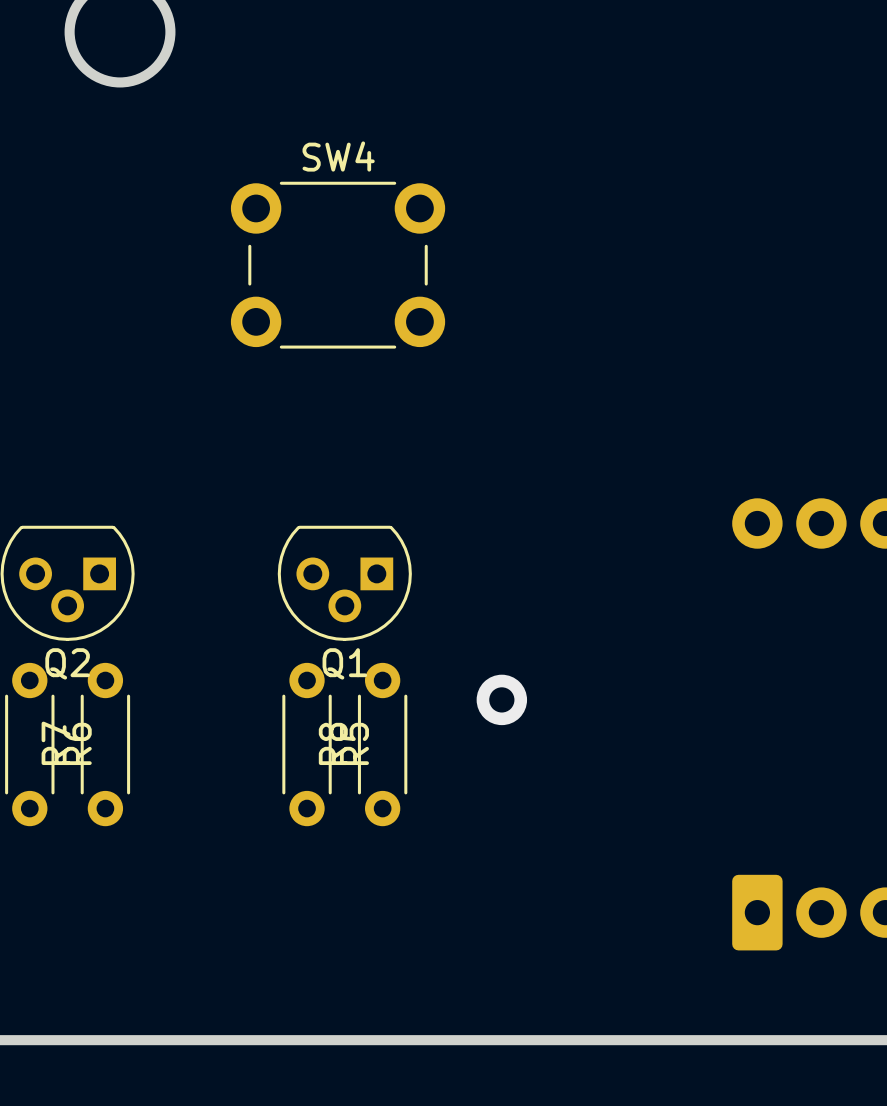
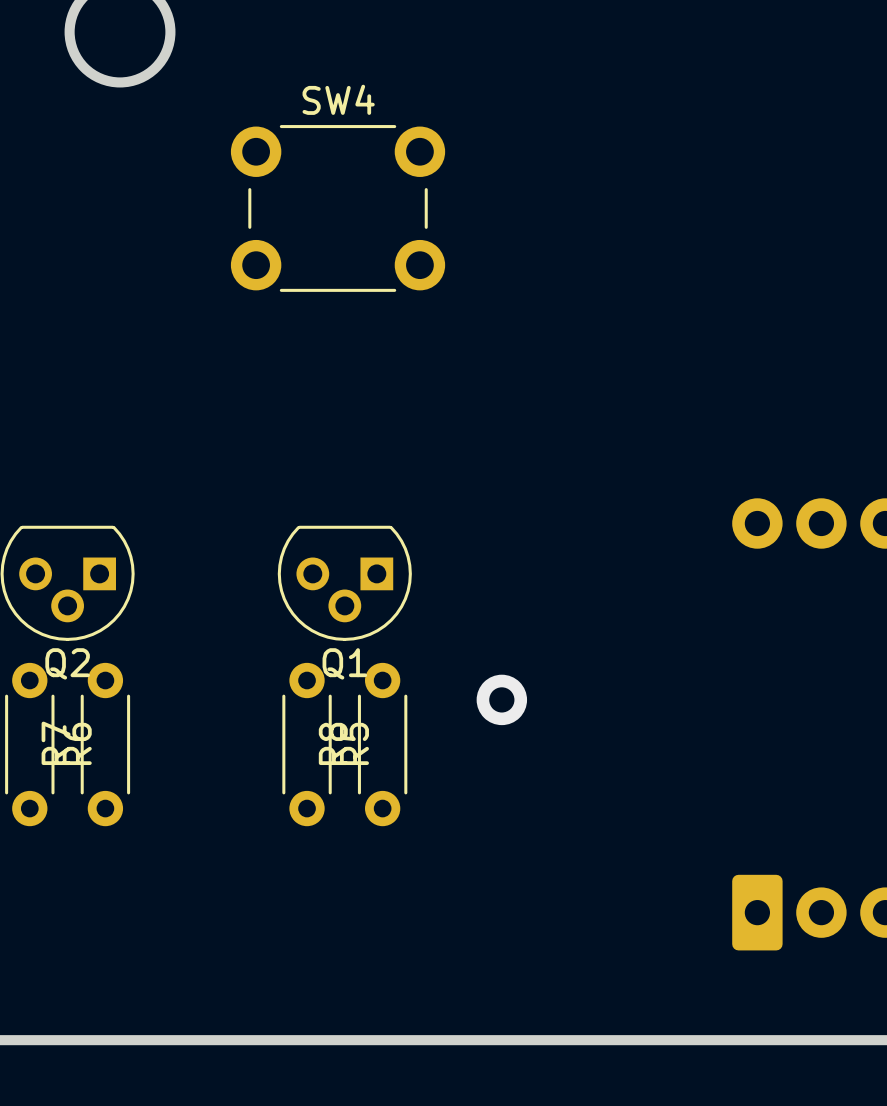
SW4 position: (338, 265) -> (338, 208)

